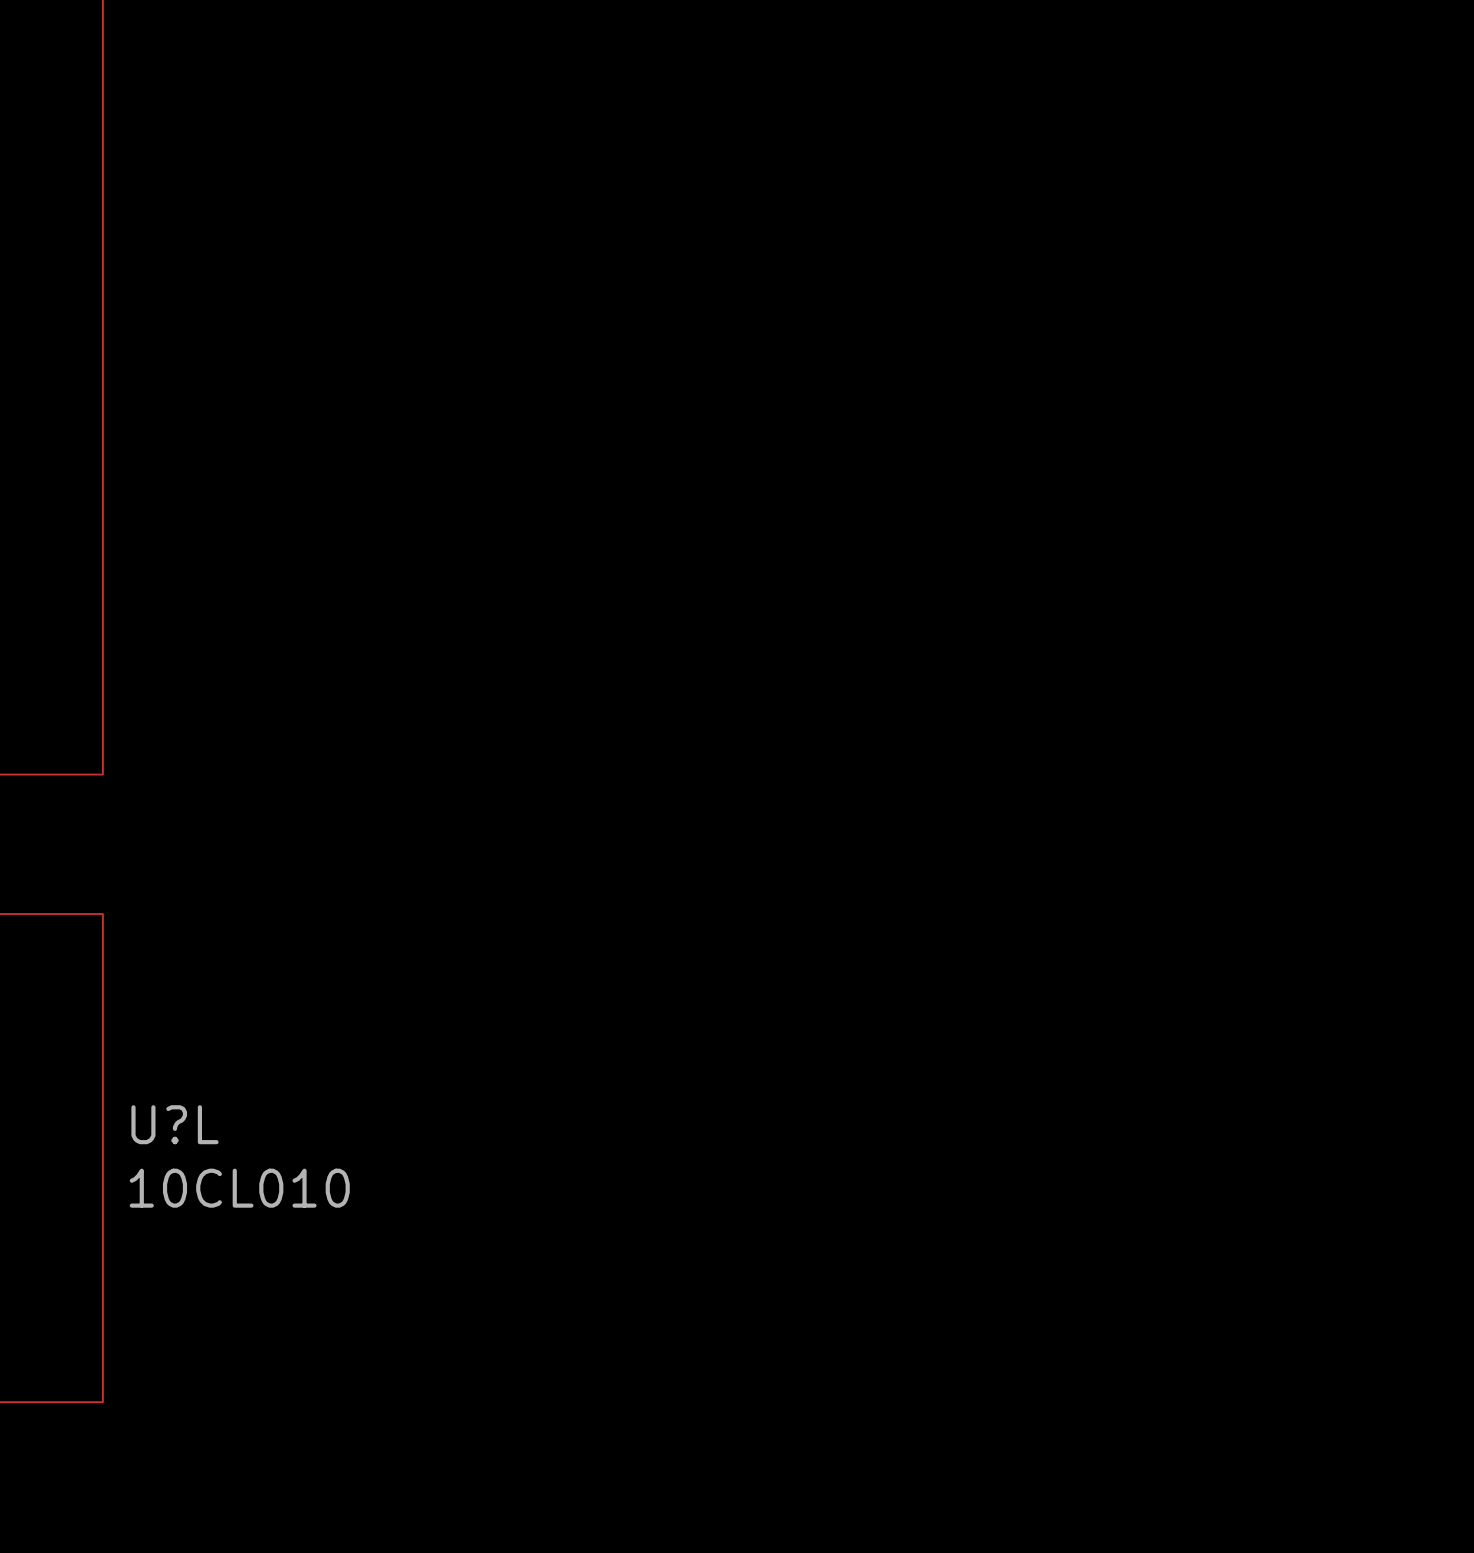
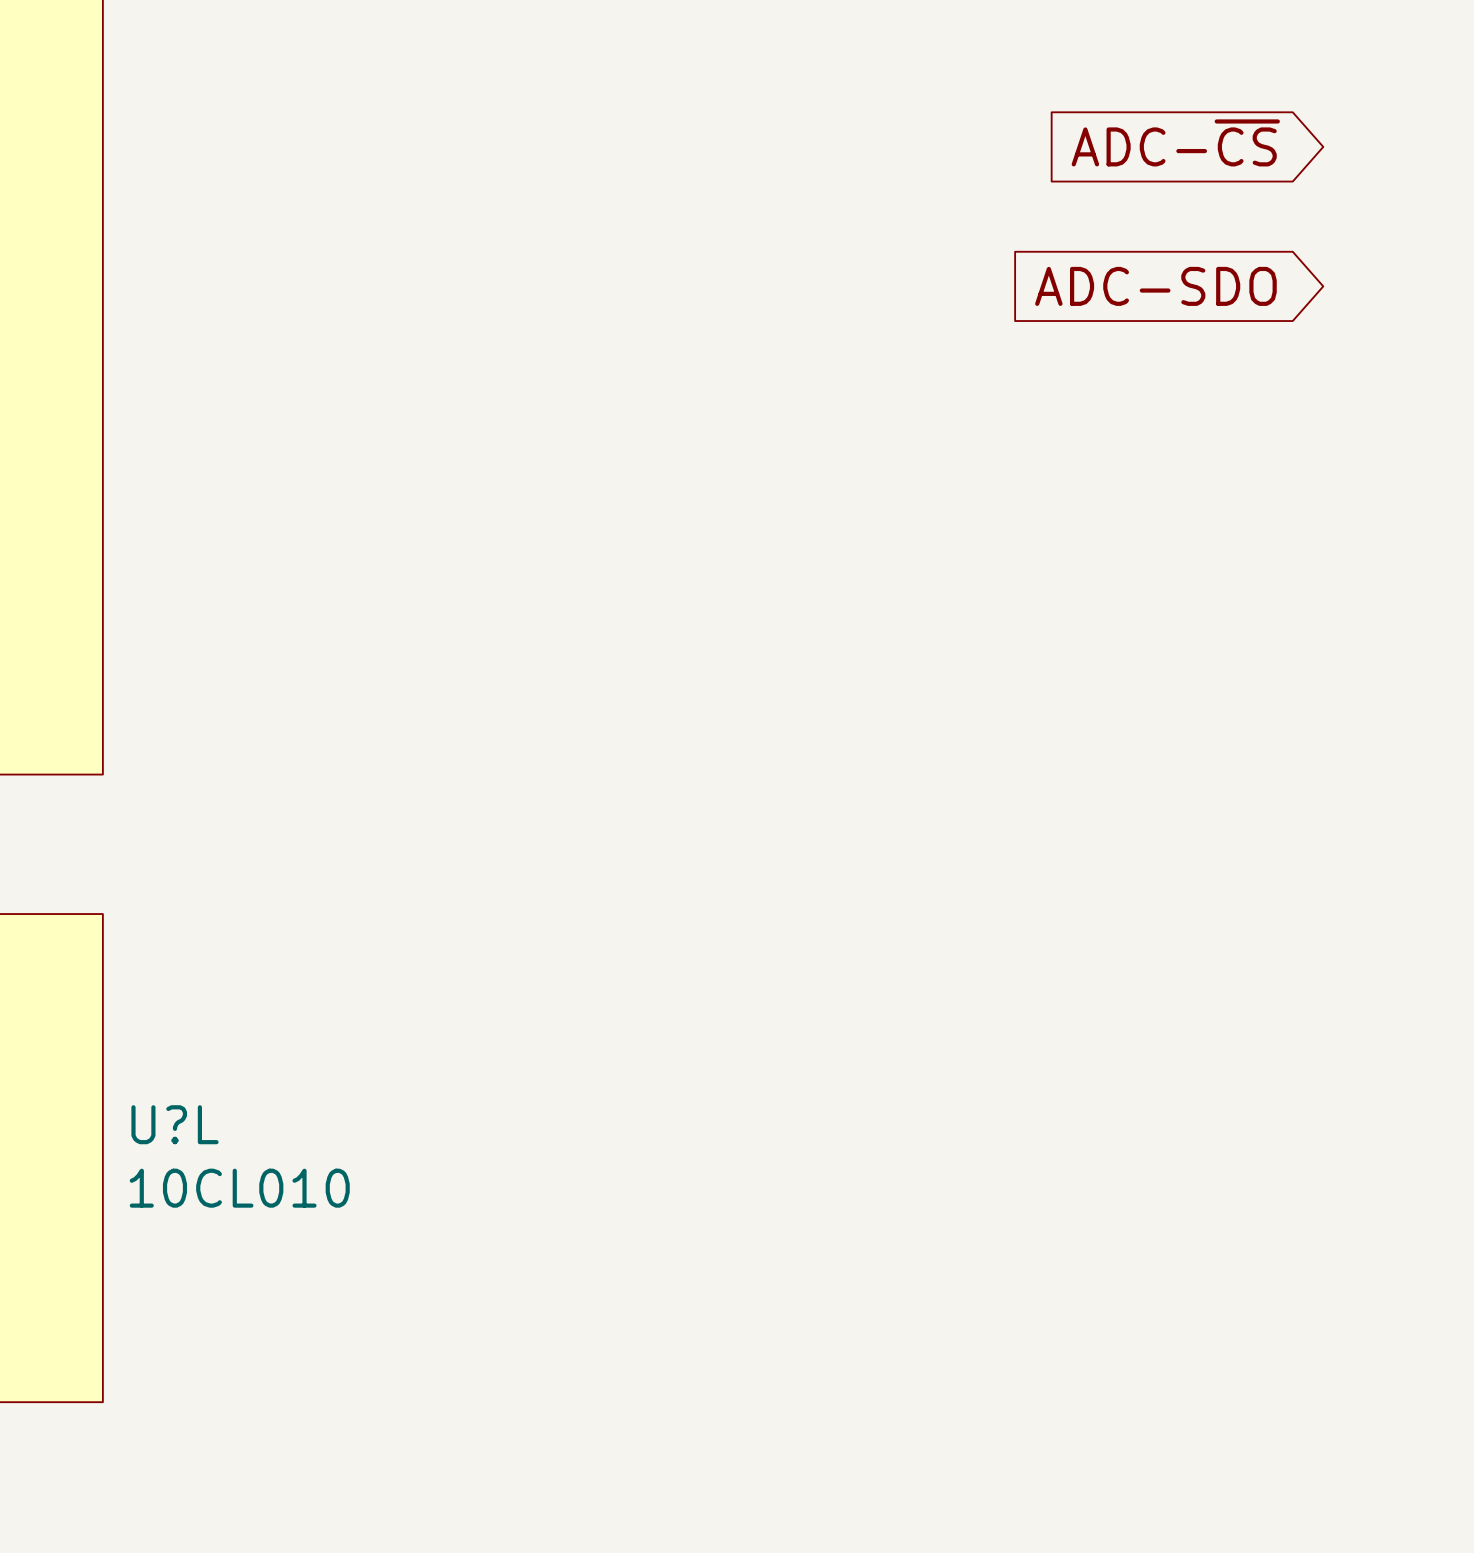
global label: none -> ADC-~{CS} (1175, 142)
global label: none -> ADC-SDO (1155, 286)

